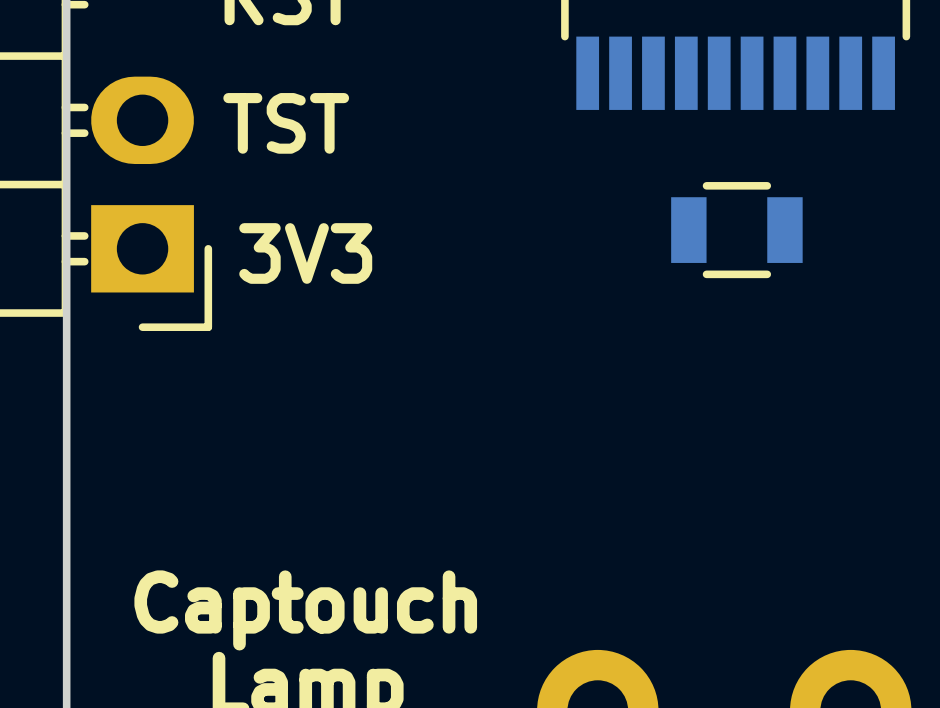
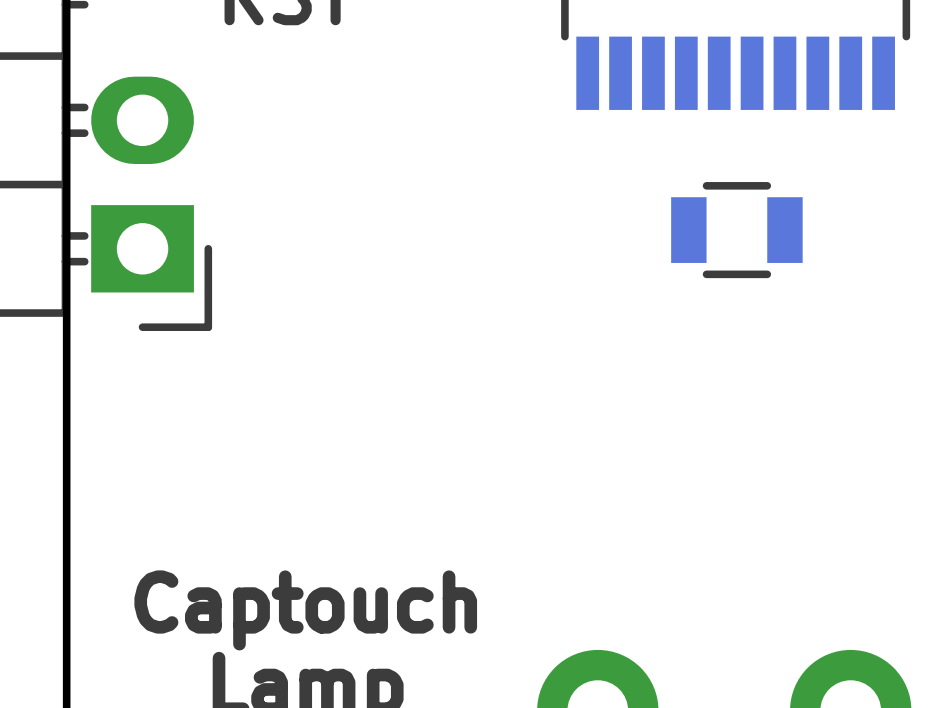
text: TST (286, 123) -> none
text: 3V3 (305, 253) -> none

